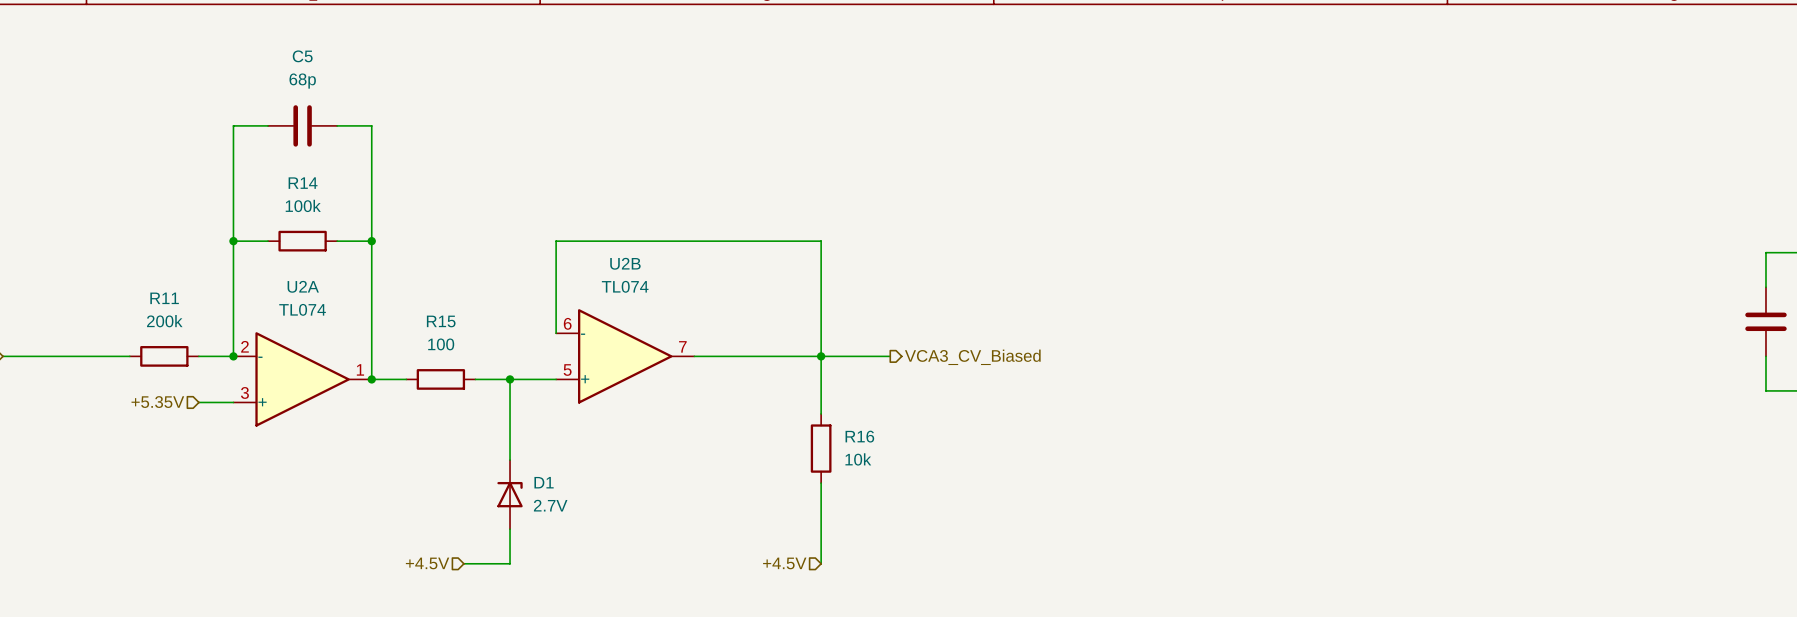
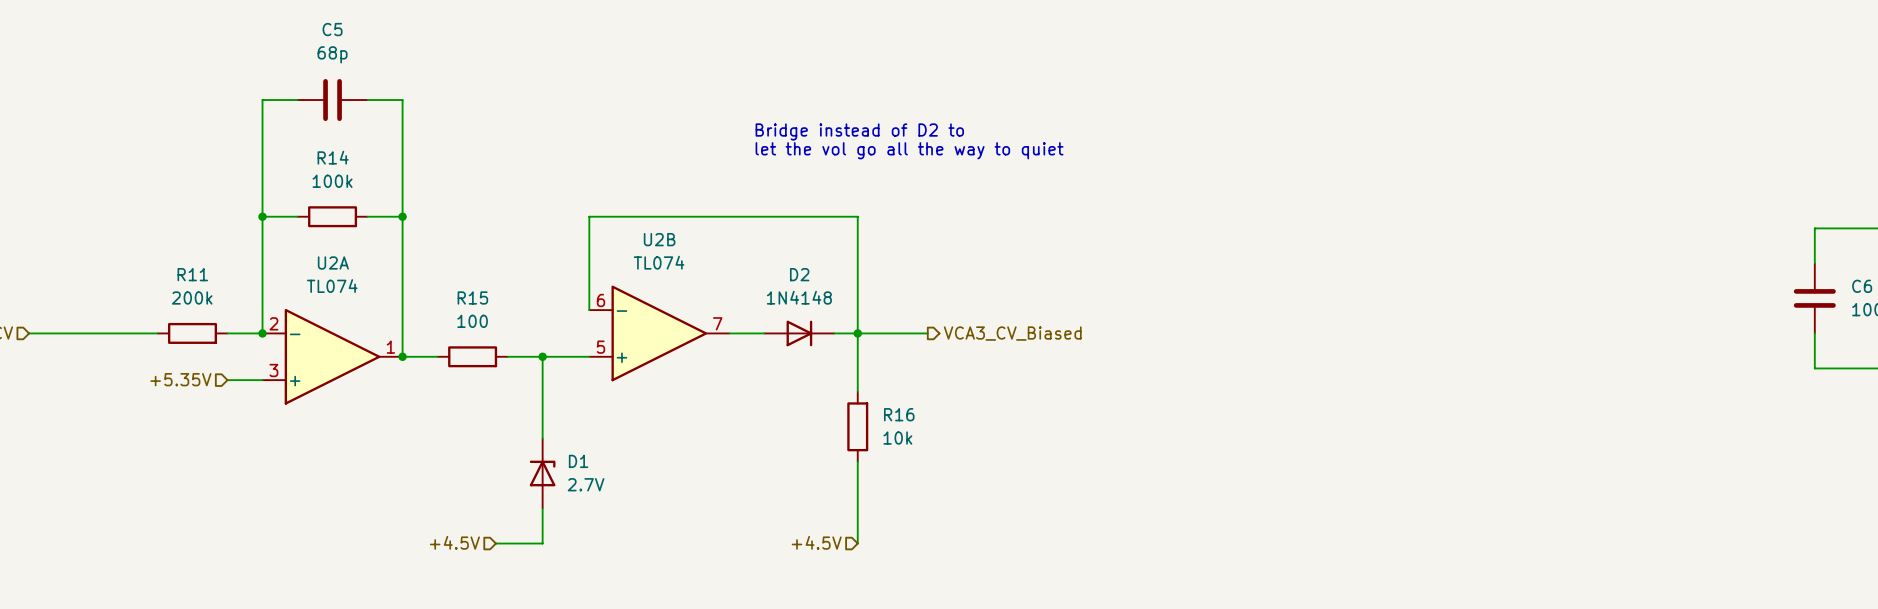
text: none -> Bridge instead of D2 to (859, 131)
text: none -> let the vol go all the way to quiet (909, 150)
D2: none -> 1N4148 (799, 333)

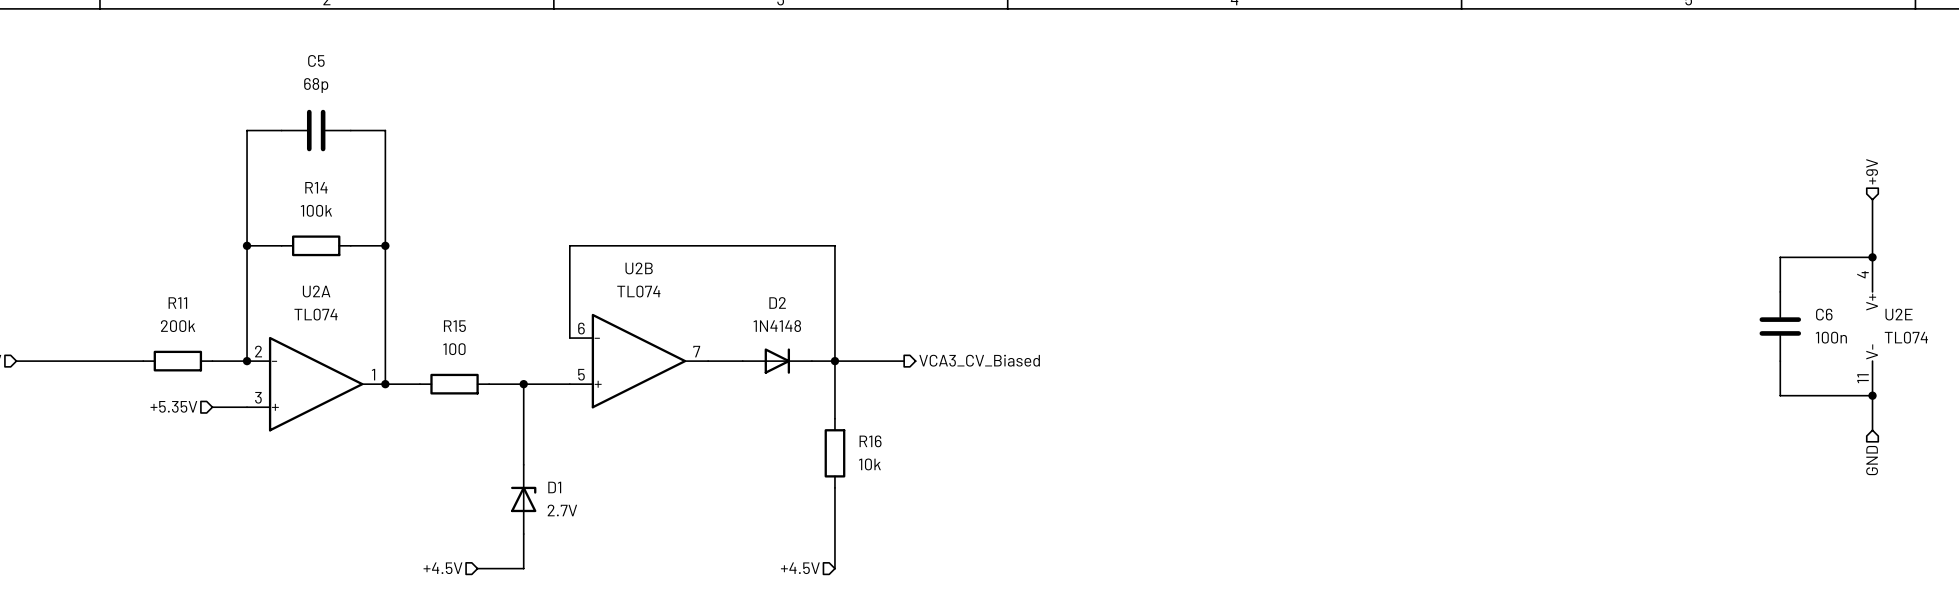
text: Bridge instead of D2 to (859, 131) -> none
text: let the vol go all the way to quiet (909, 150) -> none

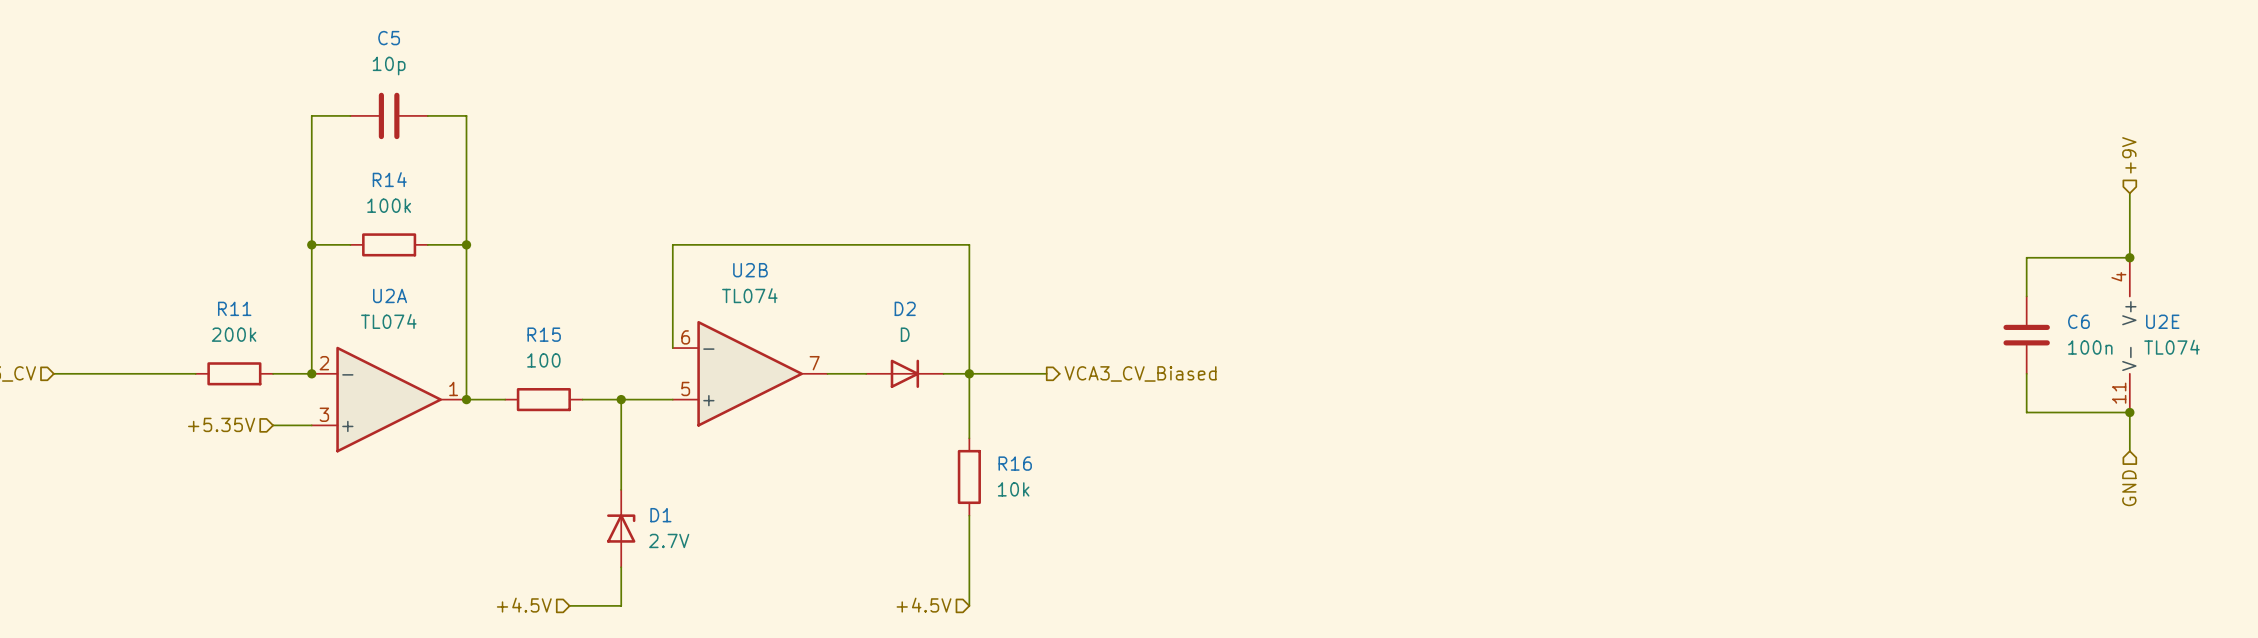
C5 value: 68p (316, 85) -> 10p (389, 66)
D2 value: 1N4148 (777, 326) -> D (905, 334)

